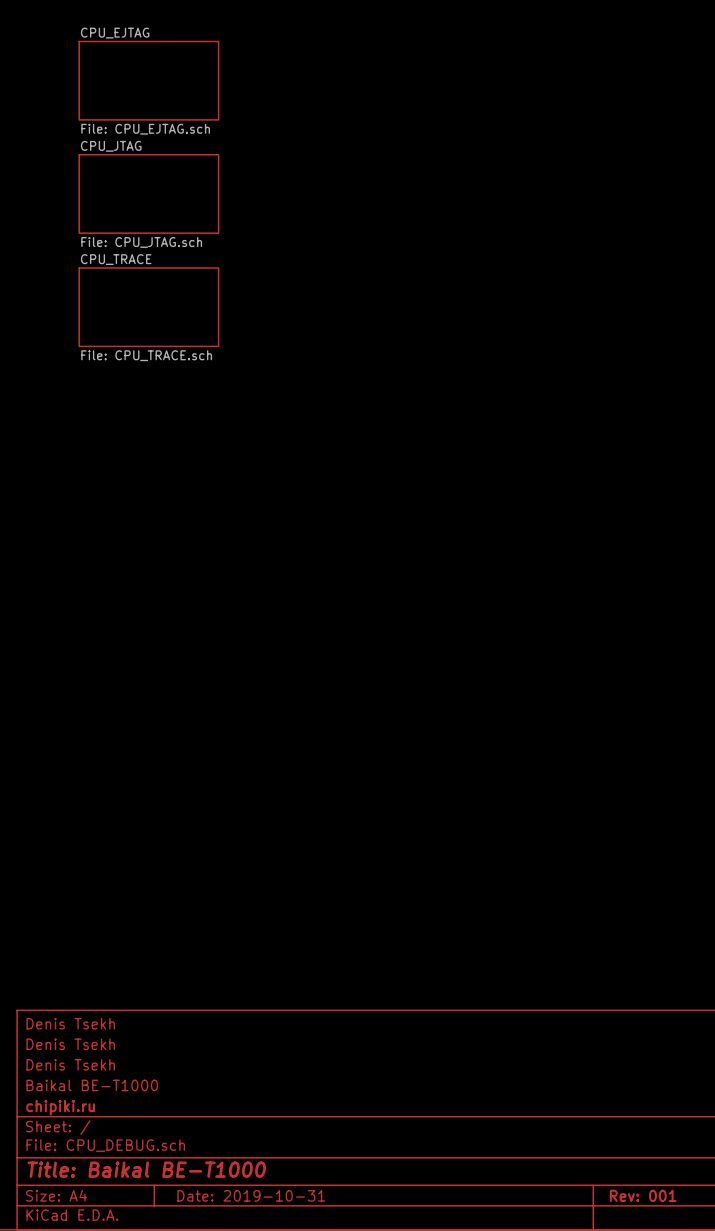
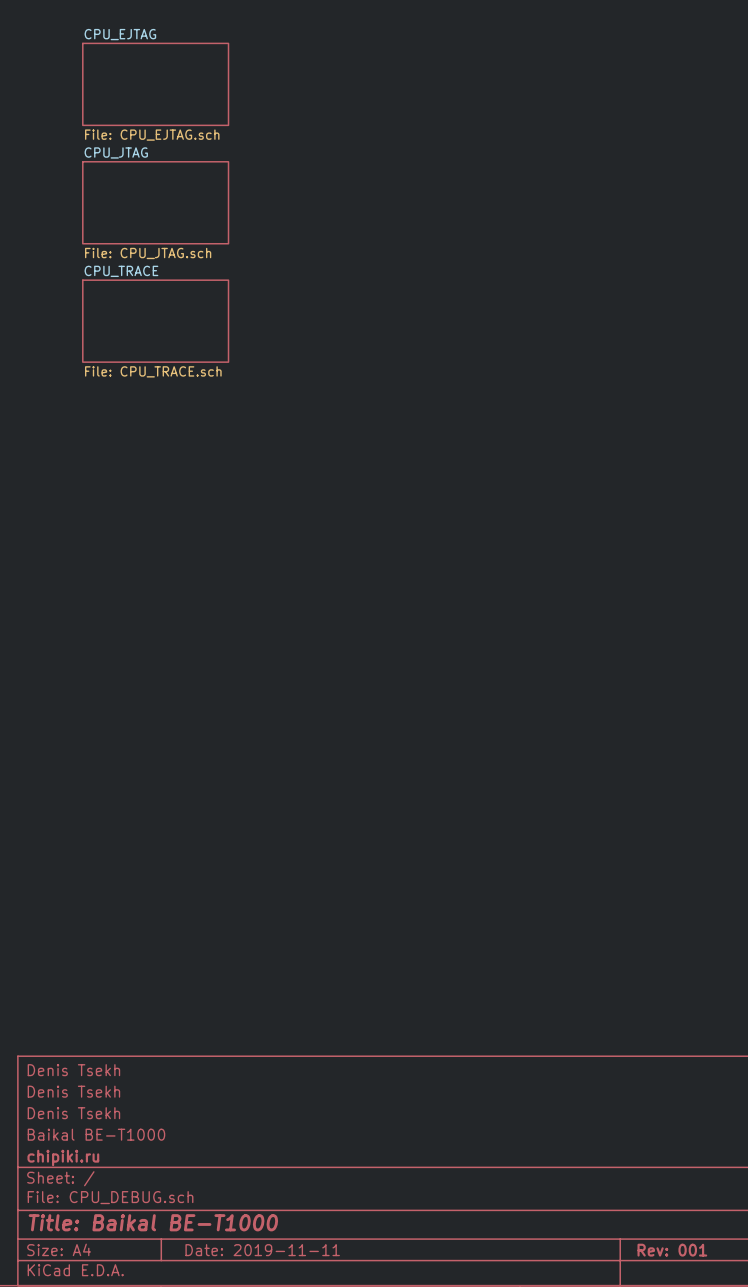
title block: Date: 2019-10-31 (251, 1195) -> Date: 2019-11-11 (262, 1250)

